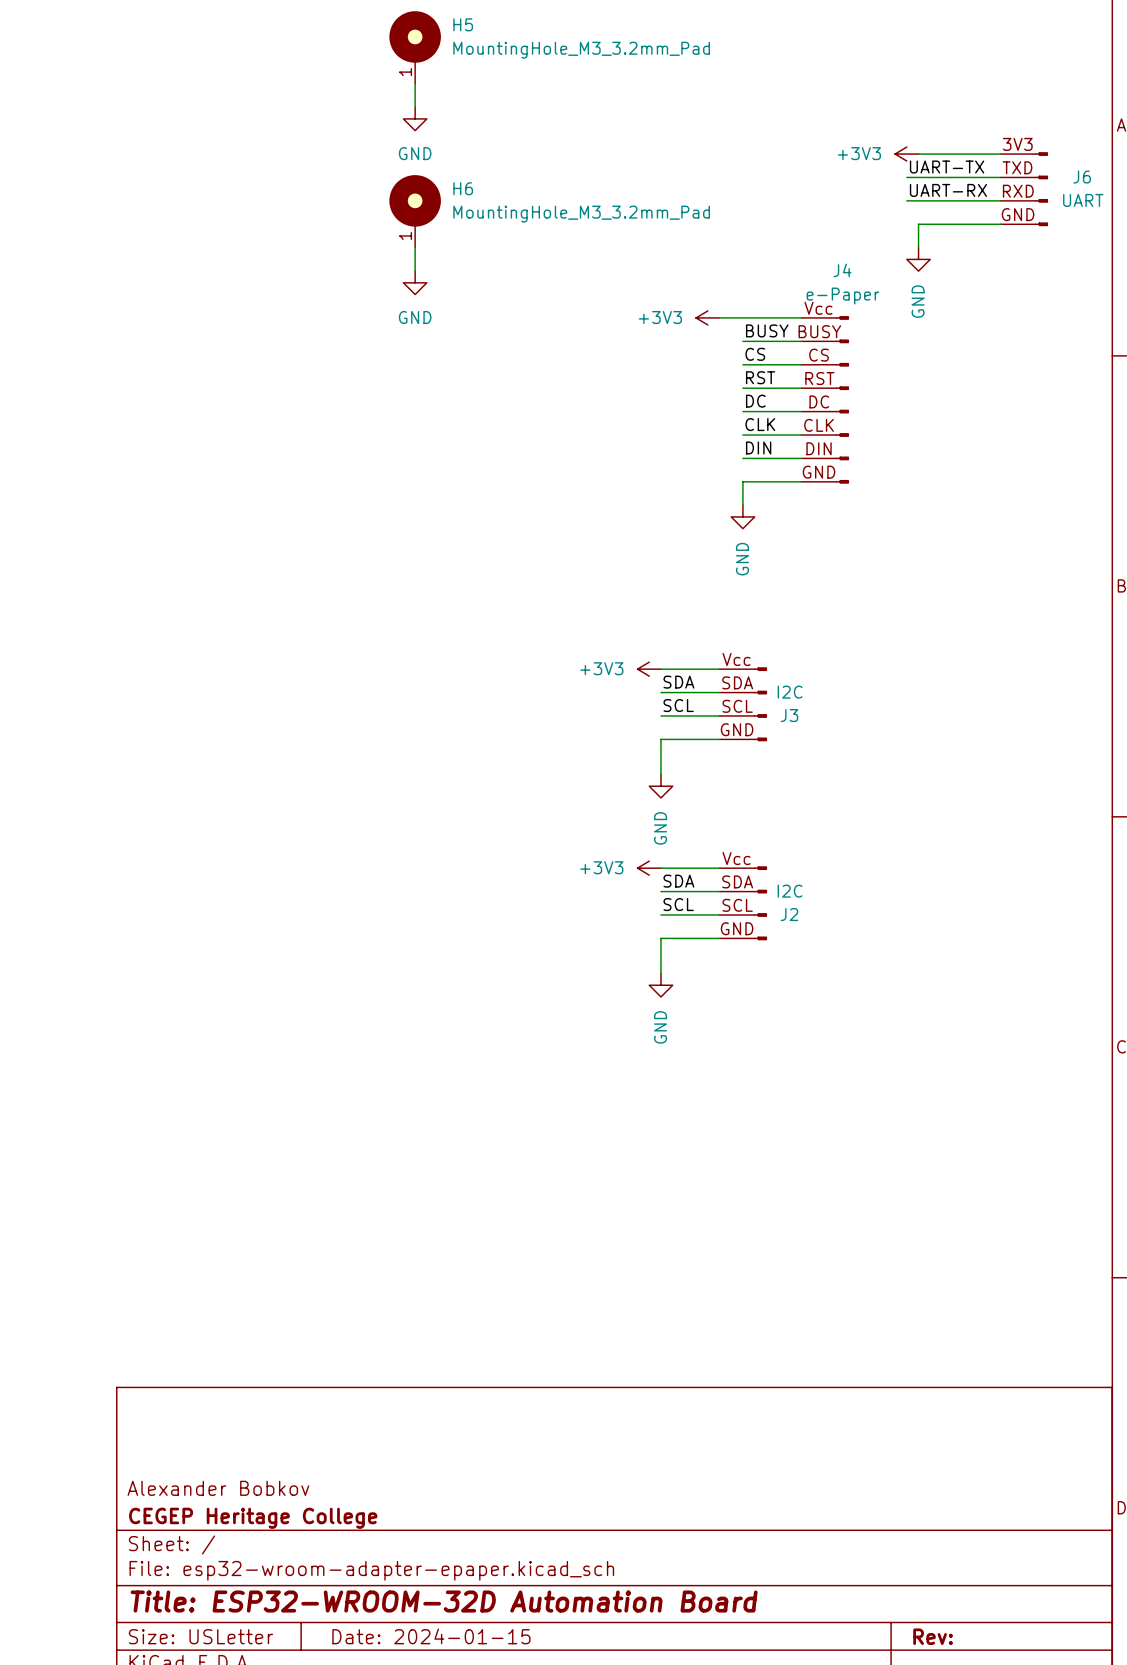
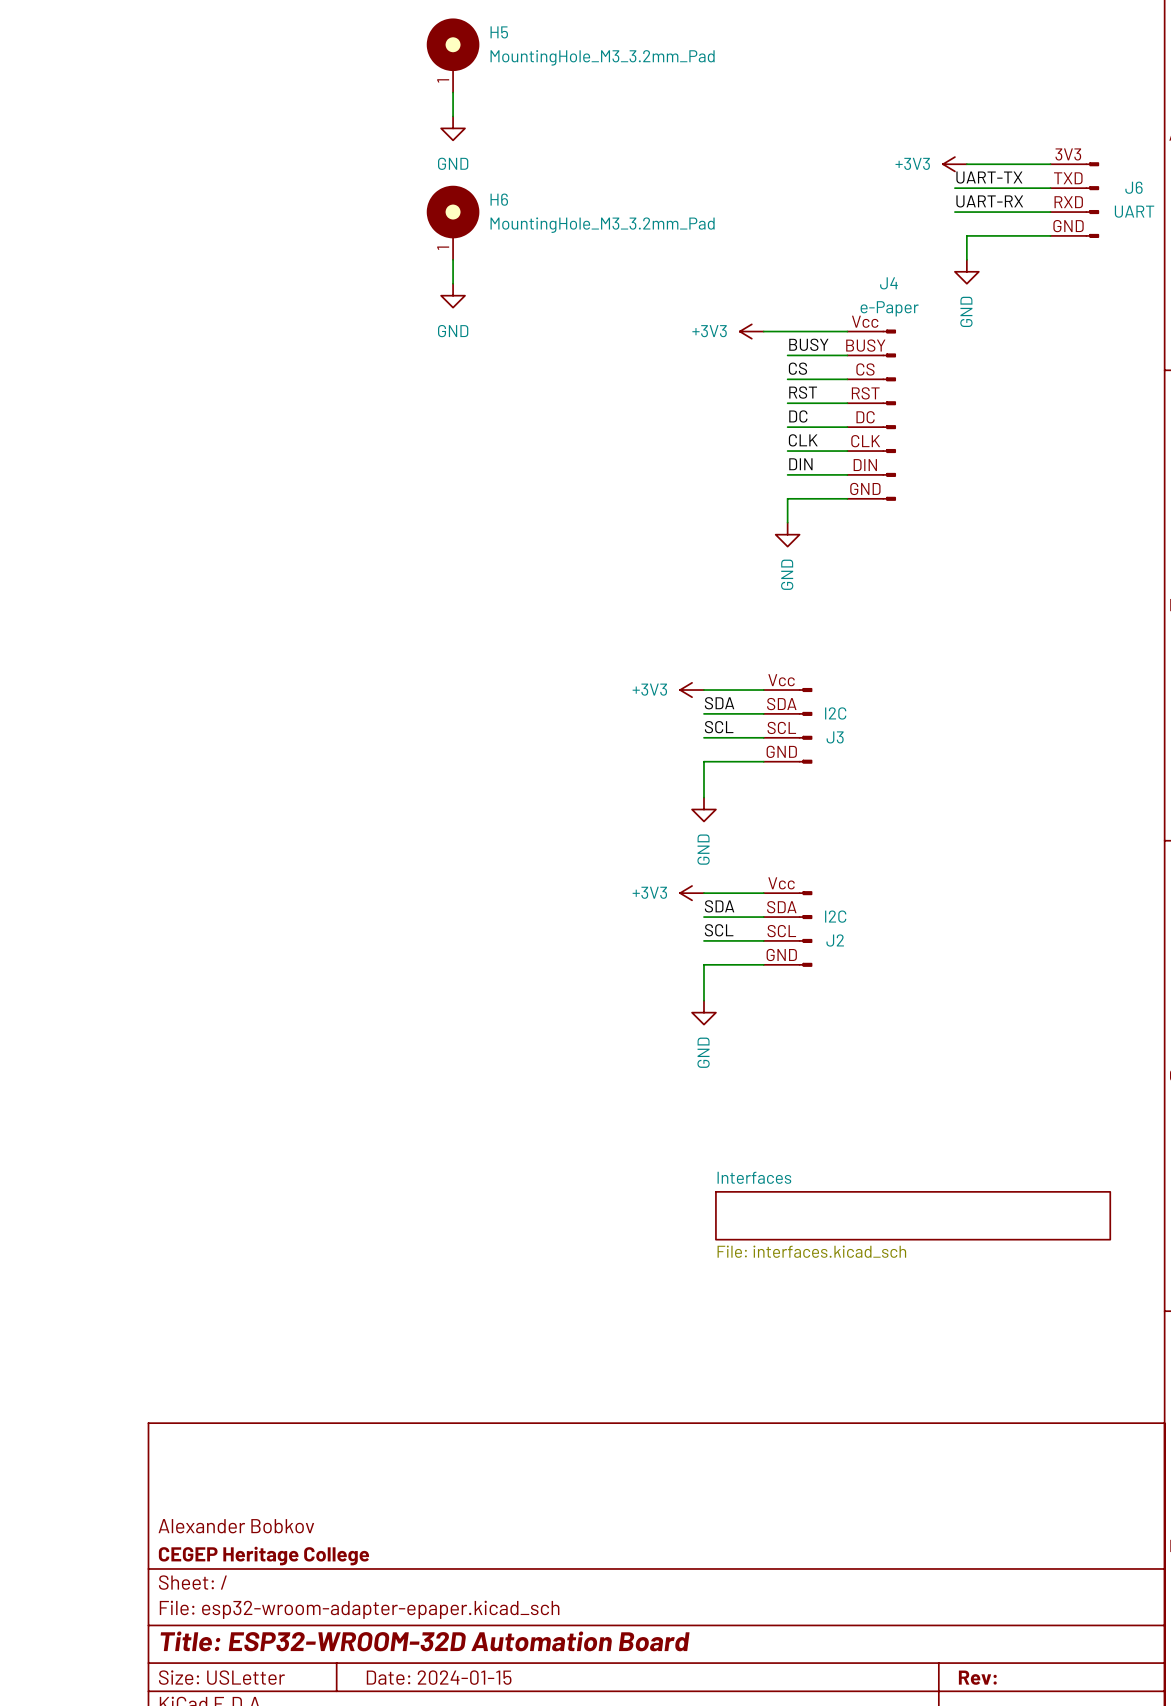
sheet Interfaces: none -> File: interfaces.kicad_sch (913, 1215)

